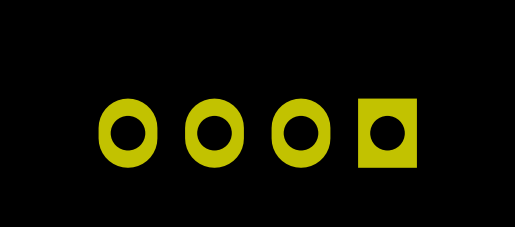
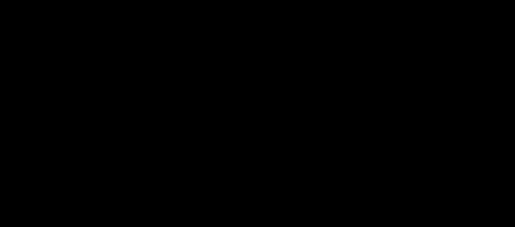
part: (257, 133) -> none

